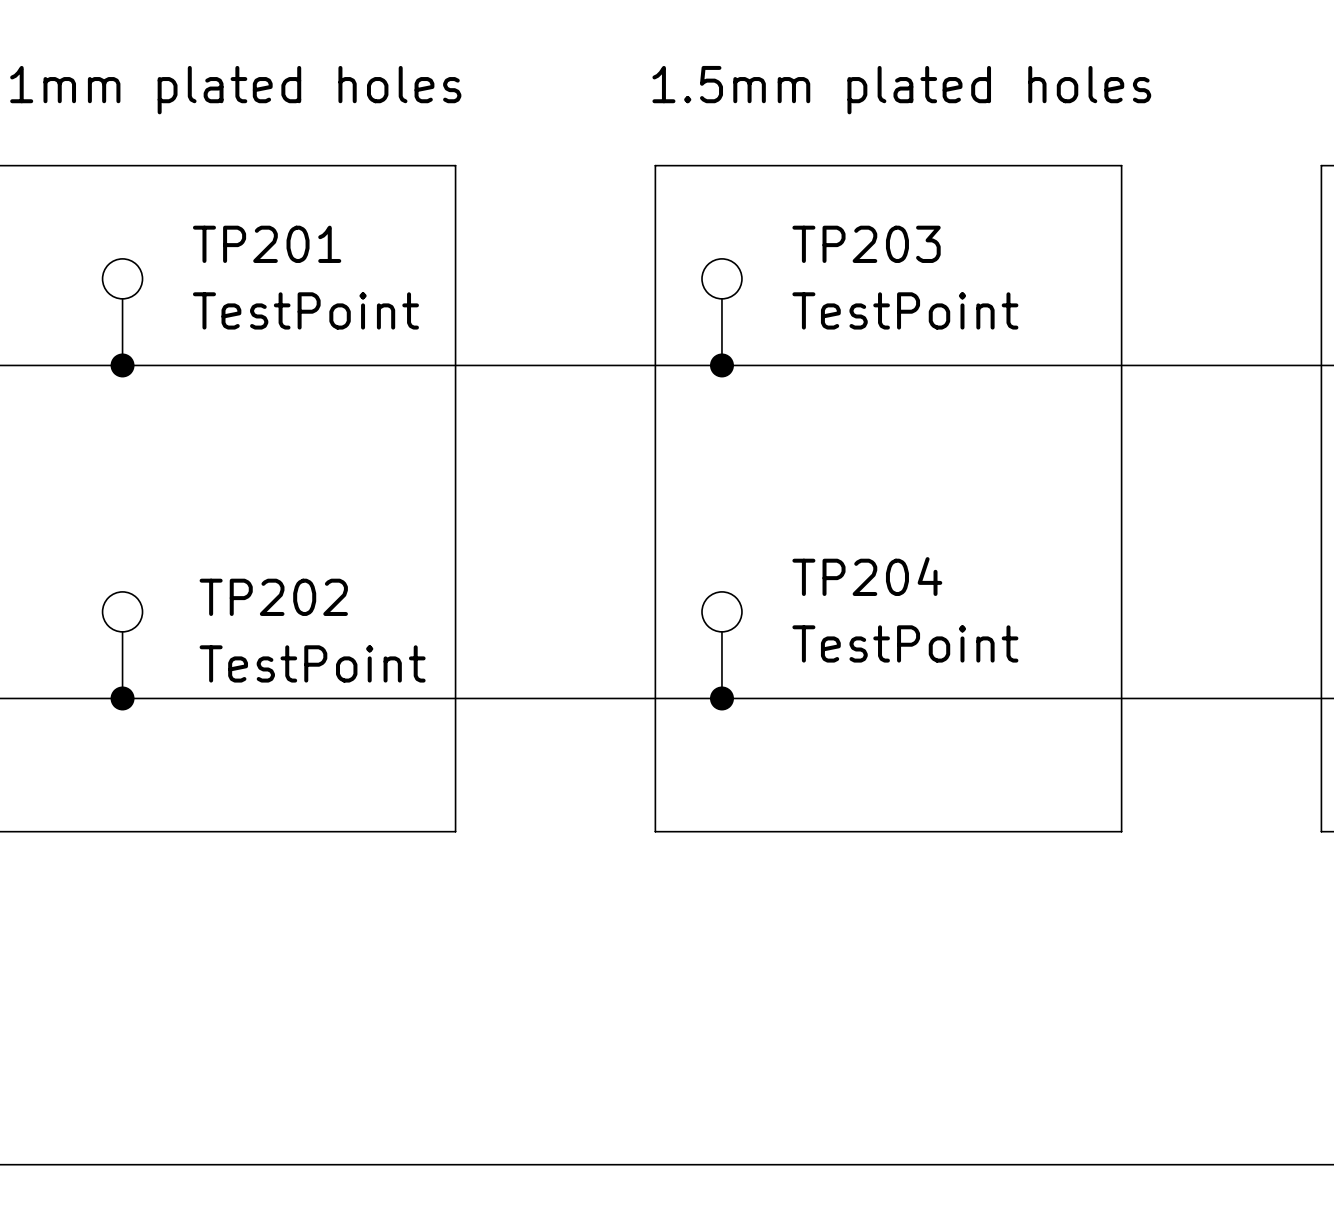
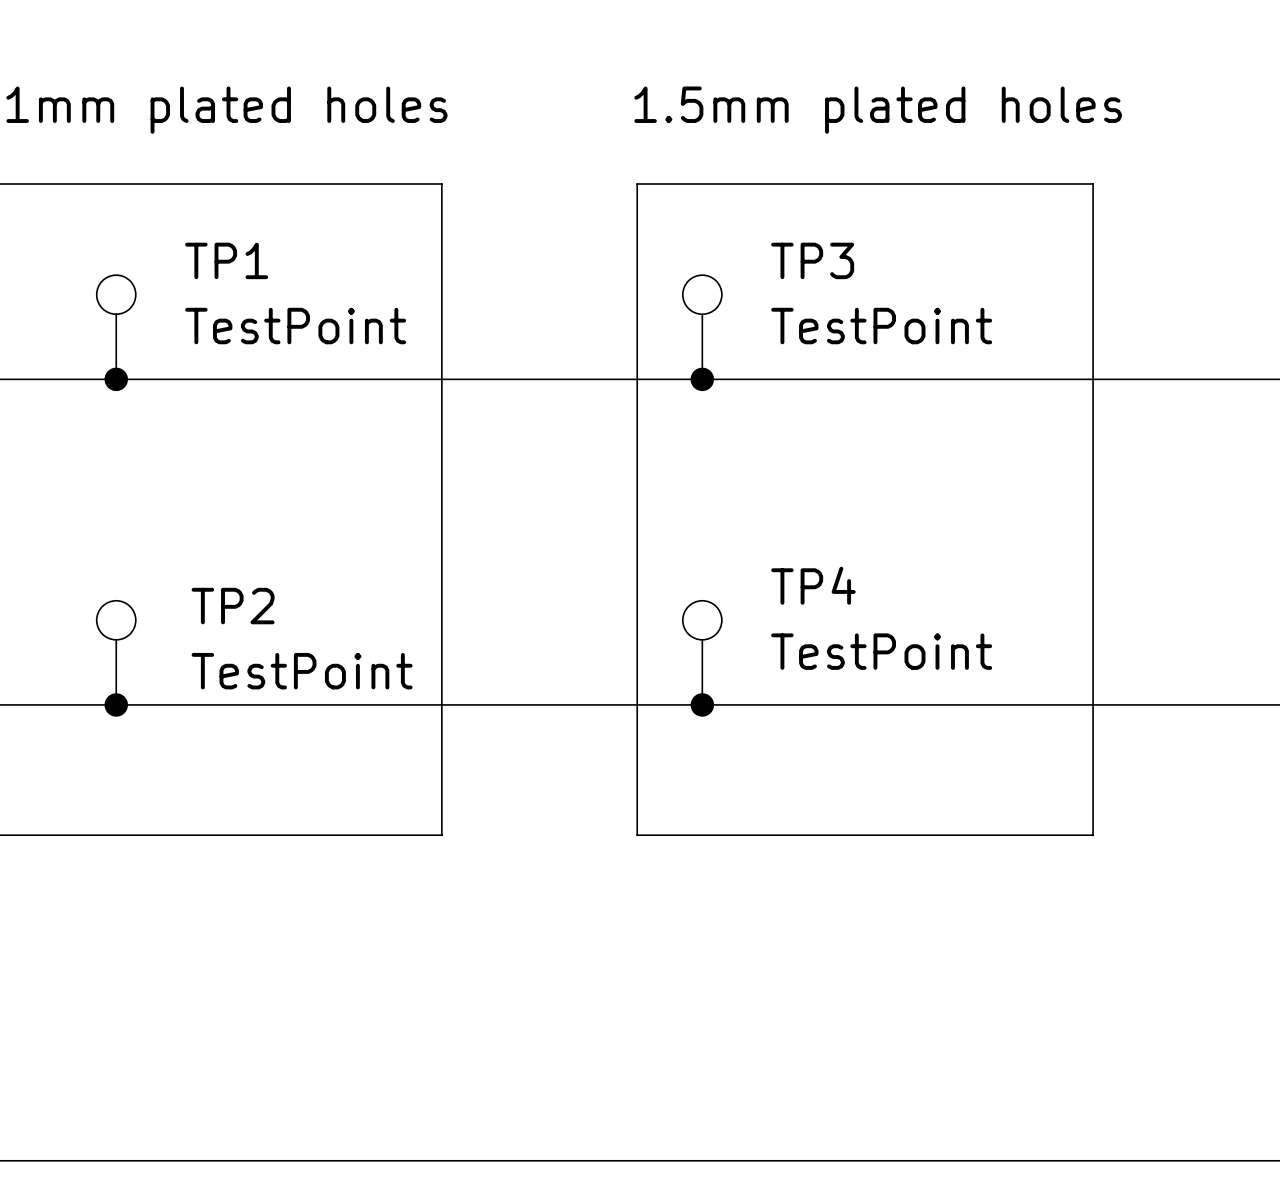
TP201 name: TP201 (267, 244) -> TP1 (226, 260)
TP203 name: TP203 (866, 244) -> TP3 (812, 260)
TP204 name: TP204 (867, 576) -> TP4 (813, 585)
TP202 name: TP202 (273, 597) -> TP2 (233, 606)

